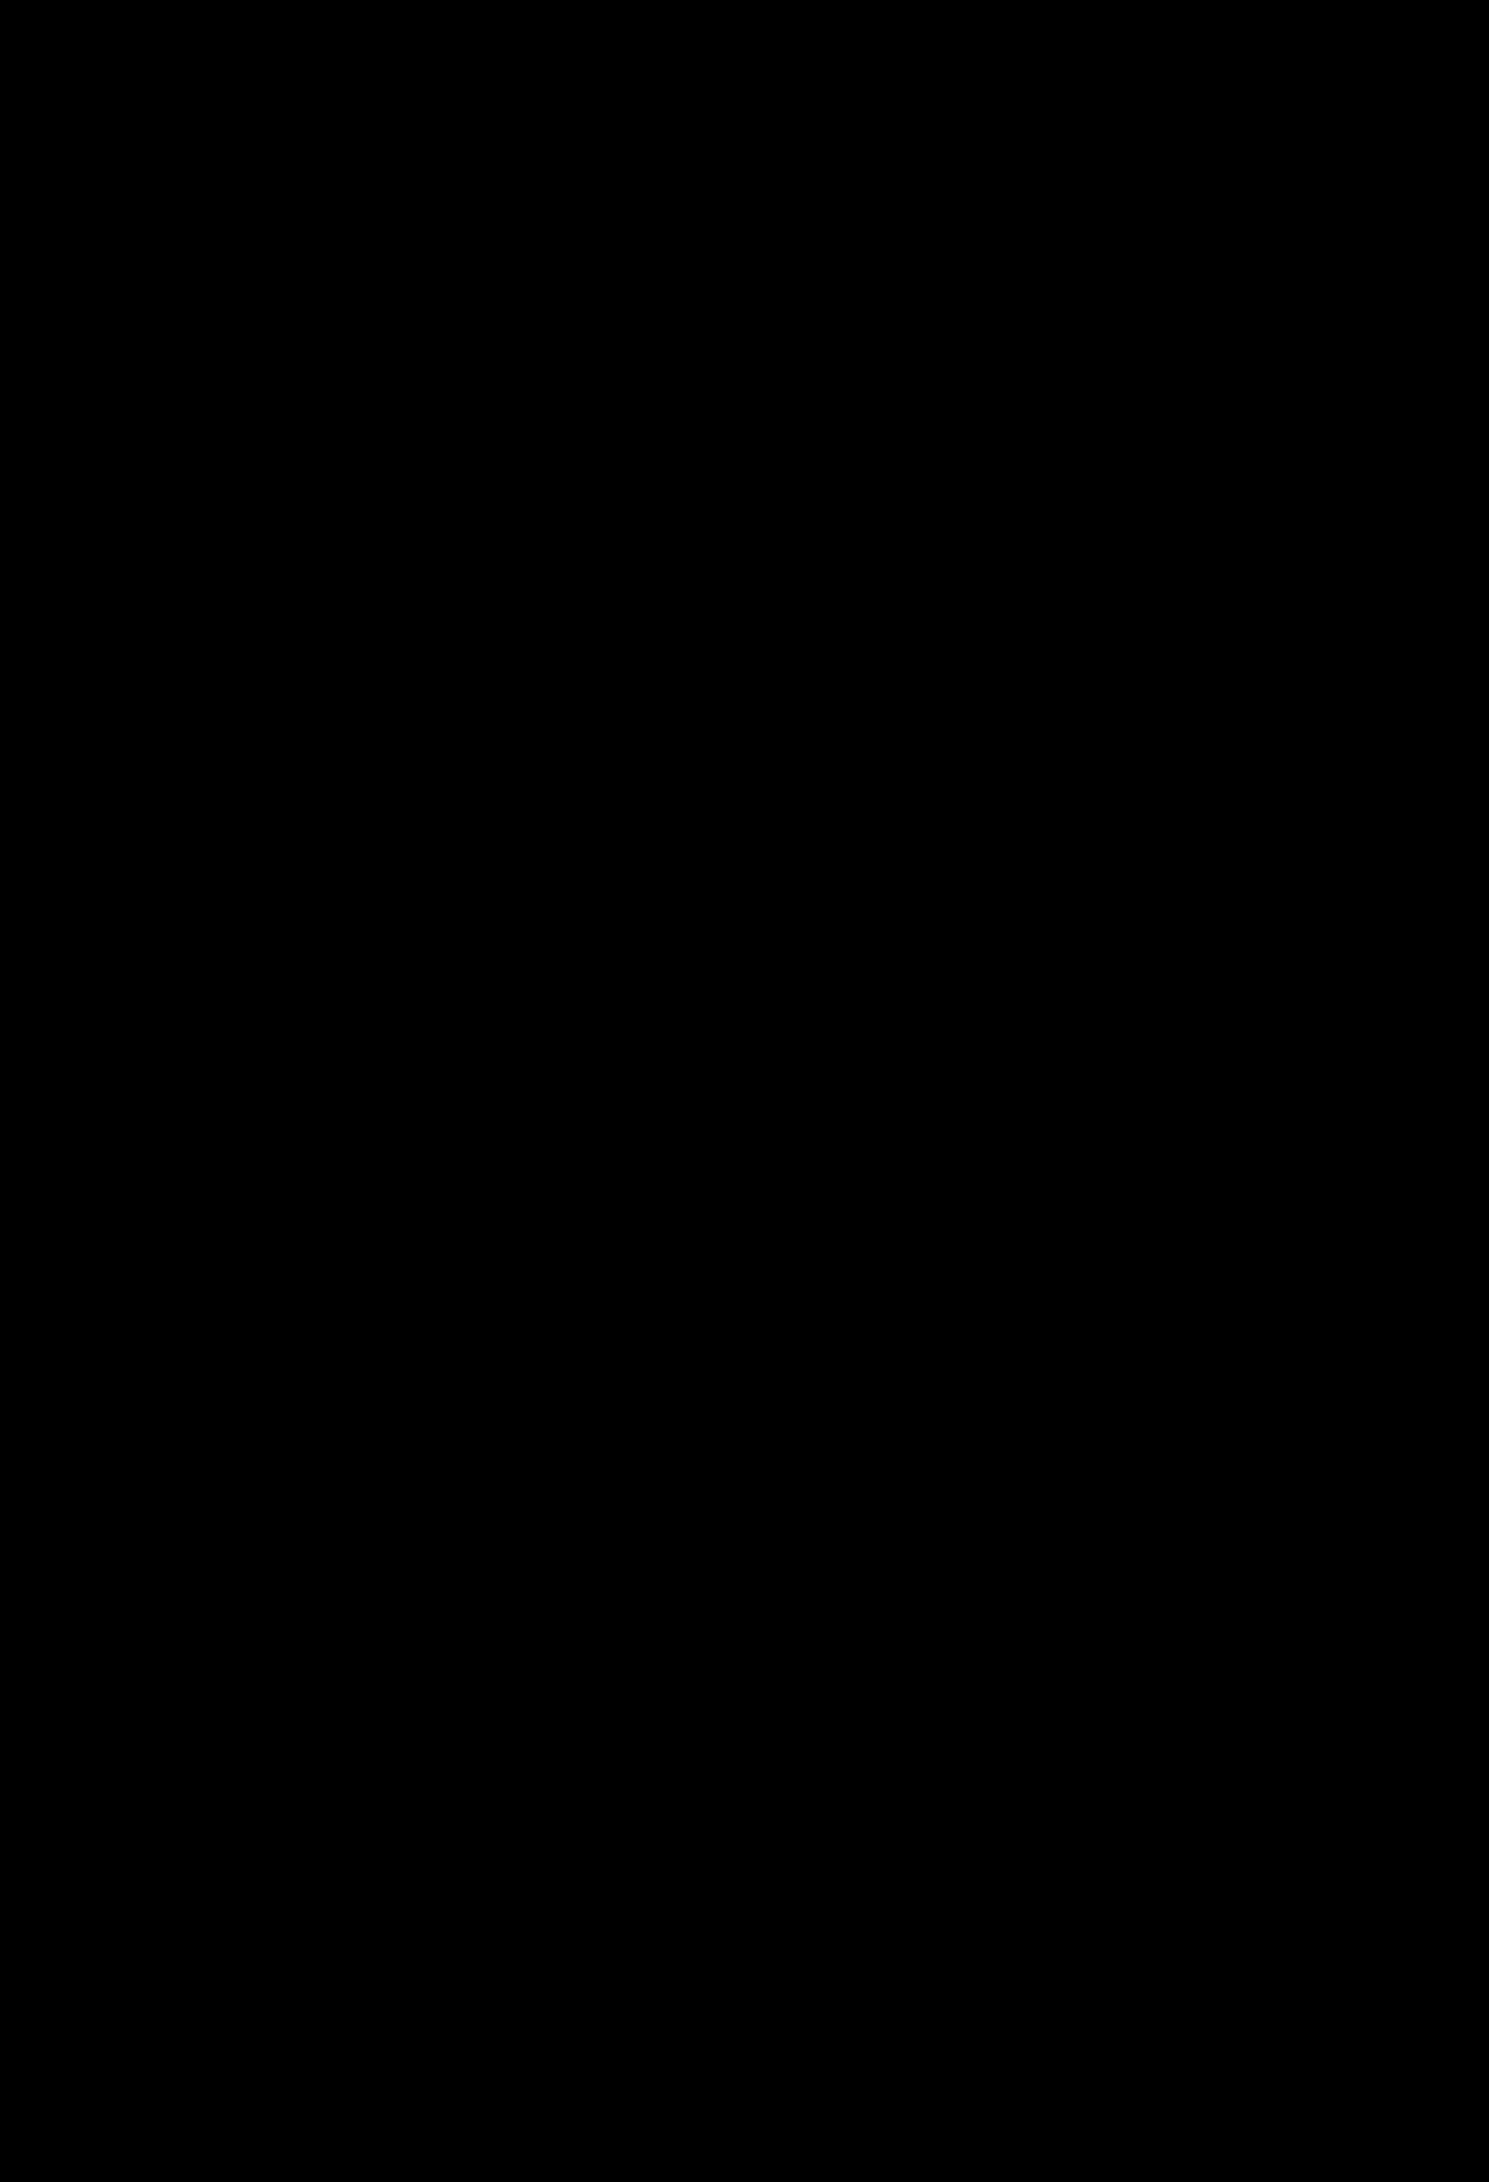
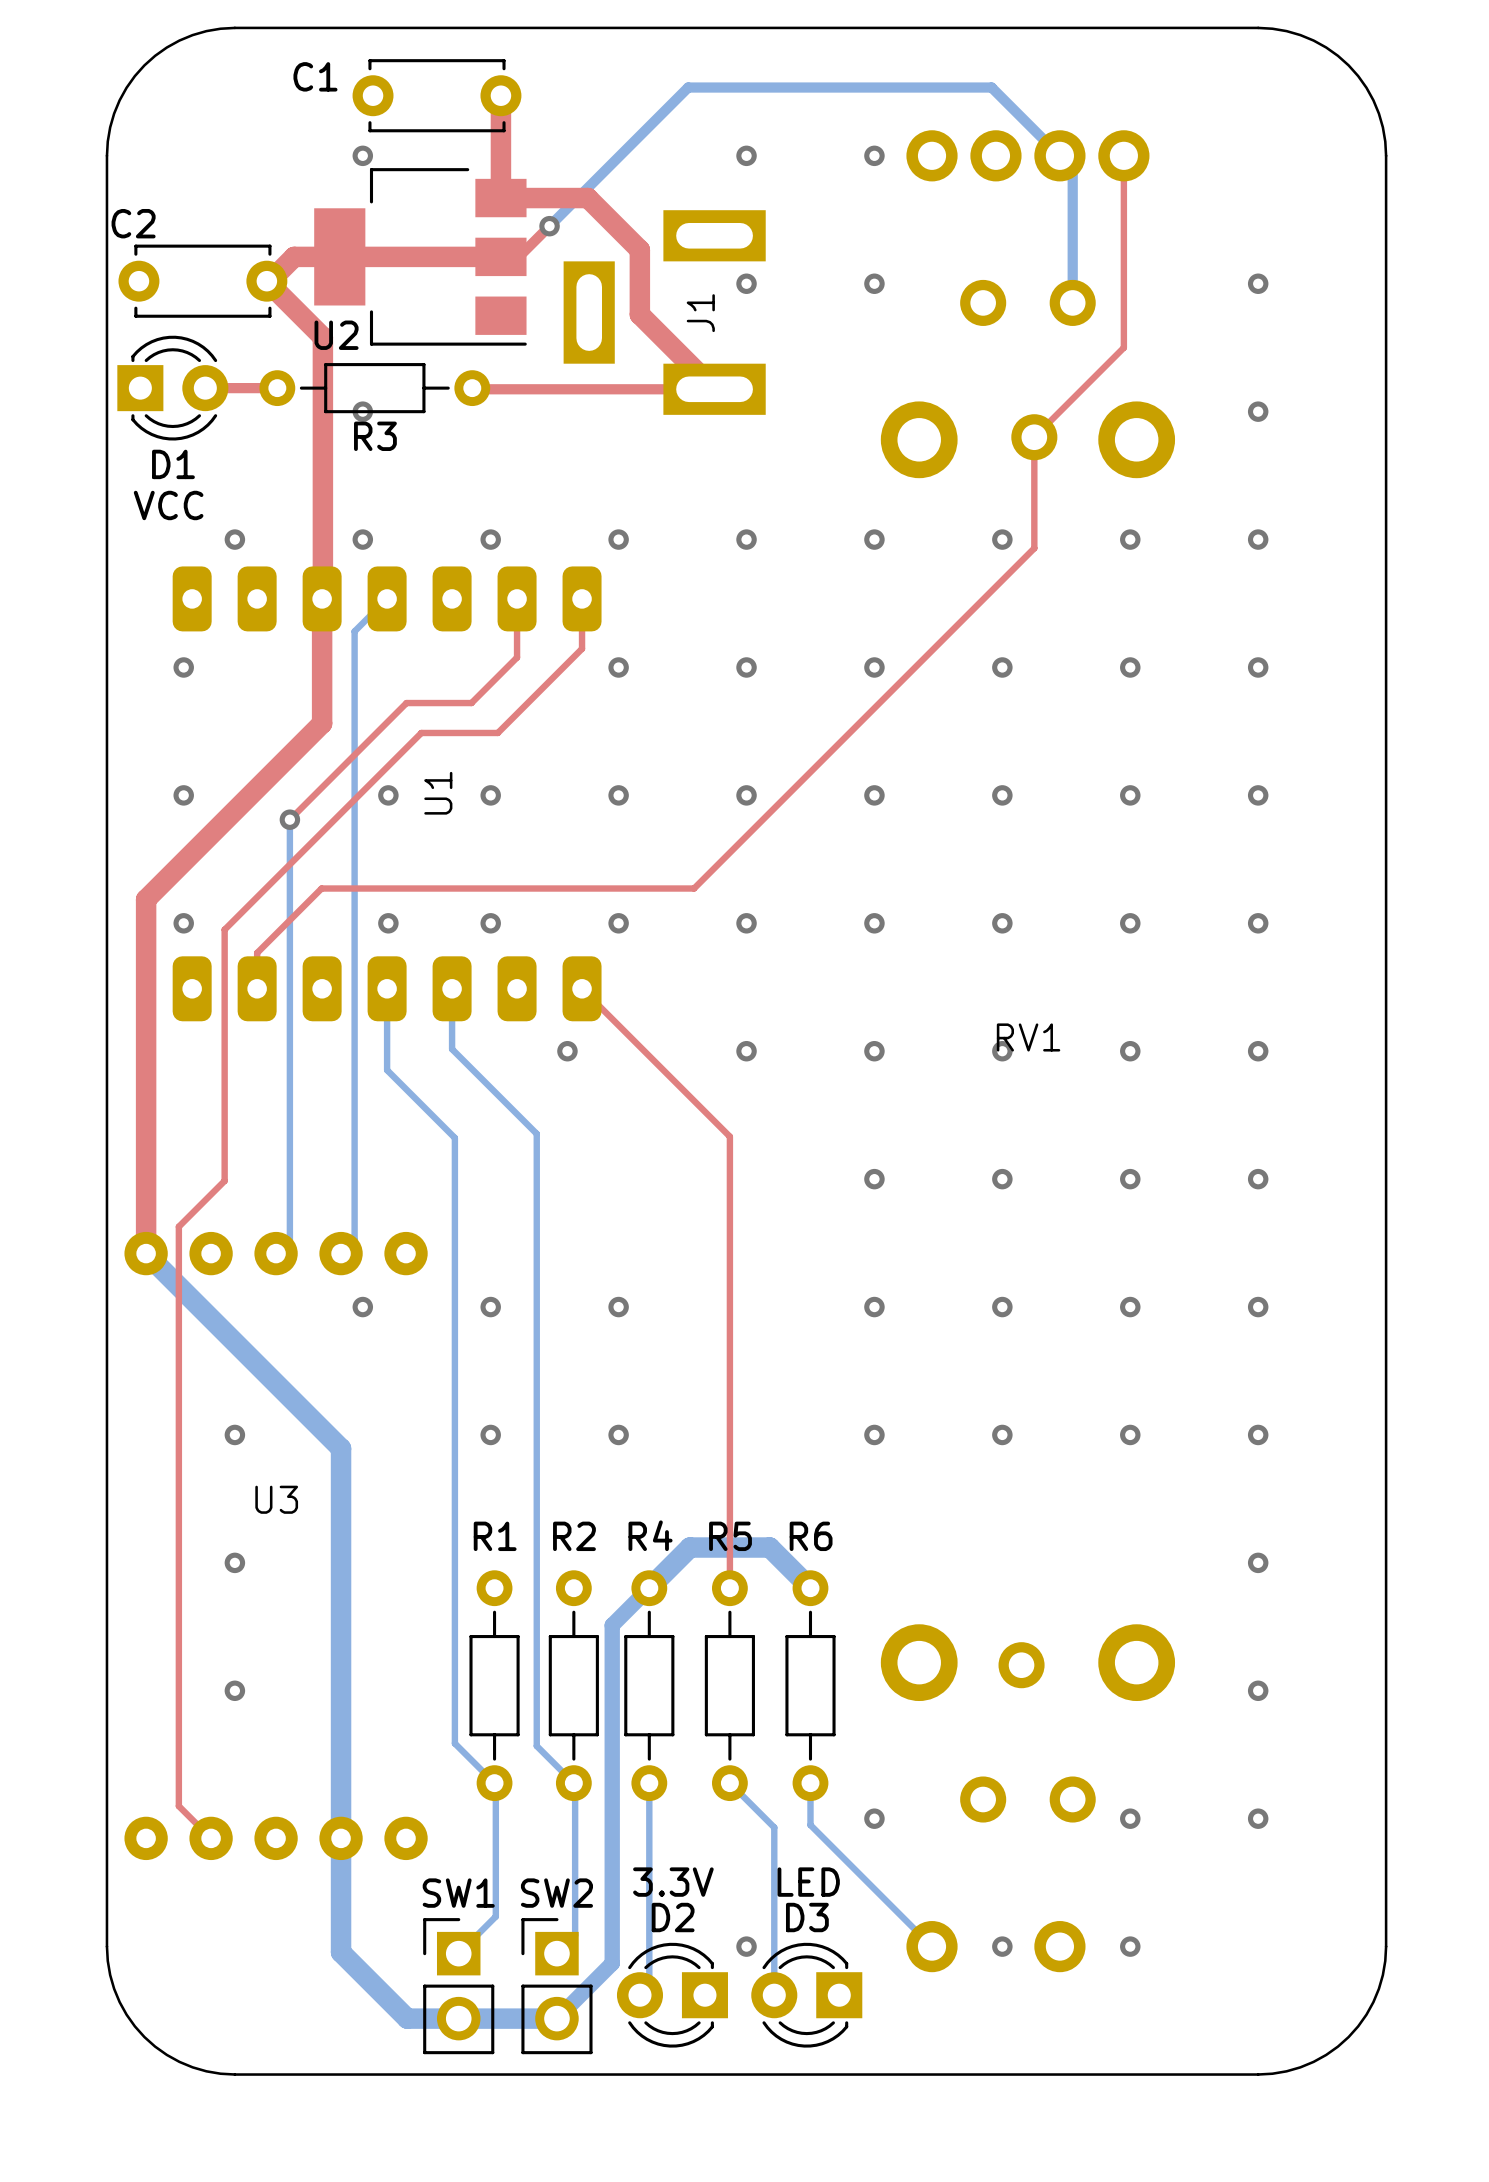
board edge: none -> (234, 27) (1272, 28) (1300, 35) (1326, 47) (1337, 55) (1358, 76) (1373, 100) (1382, 127) (1386, 155) (1386, 1946) (1385, 1960) (1378, 1988) (1366, 2014) (1348, 2037) (1337, 2046) (1313, 2061) (1286, 2071) (1258, 2074) (234, 2074) (206, 2071) (179, 2061) (166, 2054) (144, 2037) (126, 2014) (119, 2002) (110, 1975) (106, 1946) (107, 141) (110, 127) (119, 100) (134, 76) (144, 65) (166, 47) (192, 35) (220, 28) (234, 27)
C1: none -> (436, 95)
top track: none -> (500, 95) (500, 198) (587, 198) (639, 249) (639, 314) (714, 389) (472, 388)
via: none -> (362, 155)
via: none -> (746, 155)
via: none -> (874, 155)
top track: none -> (1123, 155) (1123, 347) (1034, 437) (1034, 548) (694, 888) (321, 888) (257, 952) (257, 988)
top track: none -> (549, 226) (518, 256) (294, 256) (269, 281) (266, 281) (322, 337) (322, 723) (146, 899) (146, 1253)
bottom track: none -> (549, 226) (688, 87) (991, 87) (1072, 168) (1072, 302)
via: none -> (549, 226)
U2: none -> (420, 256)
C2: none -> (202, 281)
via: none -> (746, 283)
via: none -> (874, 283)
via: none -> (1258, 283)
J1: none -> (664, 312)
D1: none -> (172, 388)
top track: none -> (205, 388) (277, 388)
R3: none -> (374, 388)
via: none -> (362, 411)
via: none -> (1258, 411)
text: none -> VCC (168, 505)
via: none -> (234, 539)
via: none -> (362, 539)
via: none -> (490, 539)
via: none -> (618, 539)
via: none -> (746, 539)
via: none -> (874, 539)
via: none -> (1002, 539)
via: none -> (1130, 539)
via: none -> (1258, 539)
bottom track: none -> (387, 598) (354, 631) (354, 1240) (341, 1253)
top track: none -> (517, 598) (517, 657) (471, 703) (406, 703) (289, 819)
top track: none -> (582, 598) (582, 648) (497, 732) (421, 732) (224, 929) (224, 1180) (178, 1226) (178, 1806) (211, 1838)
via: none -> (183, 667)
via: none -> (618, 667)
via: none -> (746, 667)
via: none -> (874, 667)
via: none -> (1002, 667)
via: none -> (1130, 667)
via: none -> (1258, 667)
U1: none -> (387, 793)
via: none -> (183, 795)
via: none -> (388, 795)
via: none -> (490, 795)
via: none -> (618, 795)
via: none -> (746, 795)
via: none -> (874, 795)
via: none -> (1002, 795)
via: none -> (1130, 795)
via: none -> (1258, 795)
bottom track: none -> (289, 819) (289, 1239) (276, 1253)
via: none -> (289, 819)
via: none -> (183, 923)
via: none -> (388, 923)
via: none -> (490, 923)
via: none -> (618, 923)
via: none -> (746, 923)
via: none -> (874, 923)
via: none -> (1002, 923)
via: none -> (1130, 923)
via: none -> (1258, 923)
bottom track: none -> (387, 988) (387, 1070) (454, 1137) (454, 1743) (495, 1784) (495, 1916) (458, 1953)
bottom track: none -> (452, 988) (452, 1049) (536, 1133) (536, 1746) (575, 1784) (575, 1935) (556, 1953)
top track: none -> (582, 988) (729, 1136) (729, 1588)
via: none -> (567, 1051)
via: none -> (746, 1051)
via: none -> (874, 1051)
via: none -> (1002, 1051)
RV1: none -> (1027, 1051)
via: none -> (1130, 1051)
via: none -> (1258, 1051)
via: none -> (874, 1179)
via: none -> (1002, 1179)
via: none -> (1130, 1179)
via: none -> (1258, 1179)
bottom track: none -> (146, 1253) (341, 1448) (341, 1952) (407, 2018) (556, 2018) (612, 1963) (612, 1625) (689, 1547) (769, 1547) (810, 1588)
via: none -> (362, 1307)
via: none -> (490, 1307)
via: none -> (618, 1307)
via: none -> (874, 1307)
via: none -> (1002, 1307)
via: none -> (1130, 1307)
via: none -> (1258, 1307)
via: none -> (234, 1434)
via: none -> (490, 1434)
via: none -> (618, 1434)
via: none -> (874, 1434)
via: none -> (1002, 1434)
via: none -> (1130, 1434)
via: none -> (1258, 1434)
U3: none -> (276, 1545)
via: none -> (234, 1562)
via: none -> (1258, 1562)
R1: none -> (494, 1685)
R2: none -> (573, 1685)
R4: none -> (649, 1685)
R5: none -> (729, 1685)
R6: none -> (810, 1685)
via: none -> (234, 1690)
via: none -> (1258, 1690)
bottom track: none -> (649, 1783) (649, 1985) (639, 1995)
bottom track: none -> (729, 1783) (774, 1827) (774, 1995)
bottom track: none -> (810, 1783) (810, 1825) (932, 1946)
via: none -> (874, 1818)
via: none -> (1130, 1818)
via: none -> (1258, 1818)
text: none -> 3.3V (673, 1882)
text: none -> LED (808, 1882)
via: none -> (746, 1946)
via: none -> (1002, 1946)
via: none -> (1130, 1946)
SW1: none -> (458, 1986)
SW2: none -> (556, 1986)
D2: none -> (672, 1995)
D3: none -> (806, 1995)

